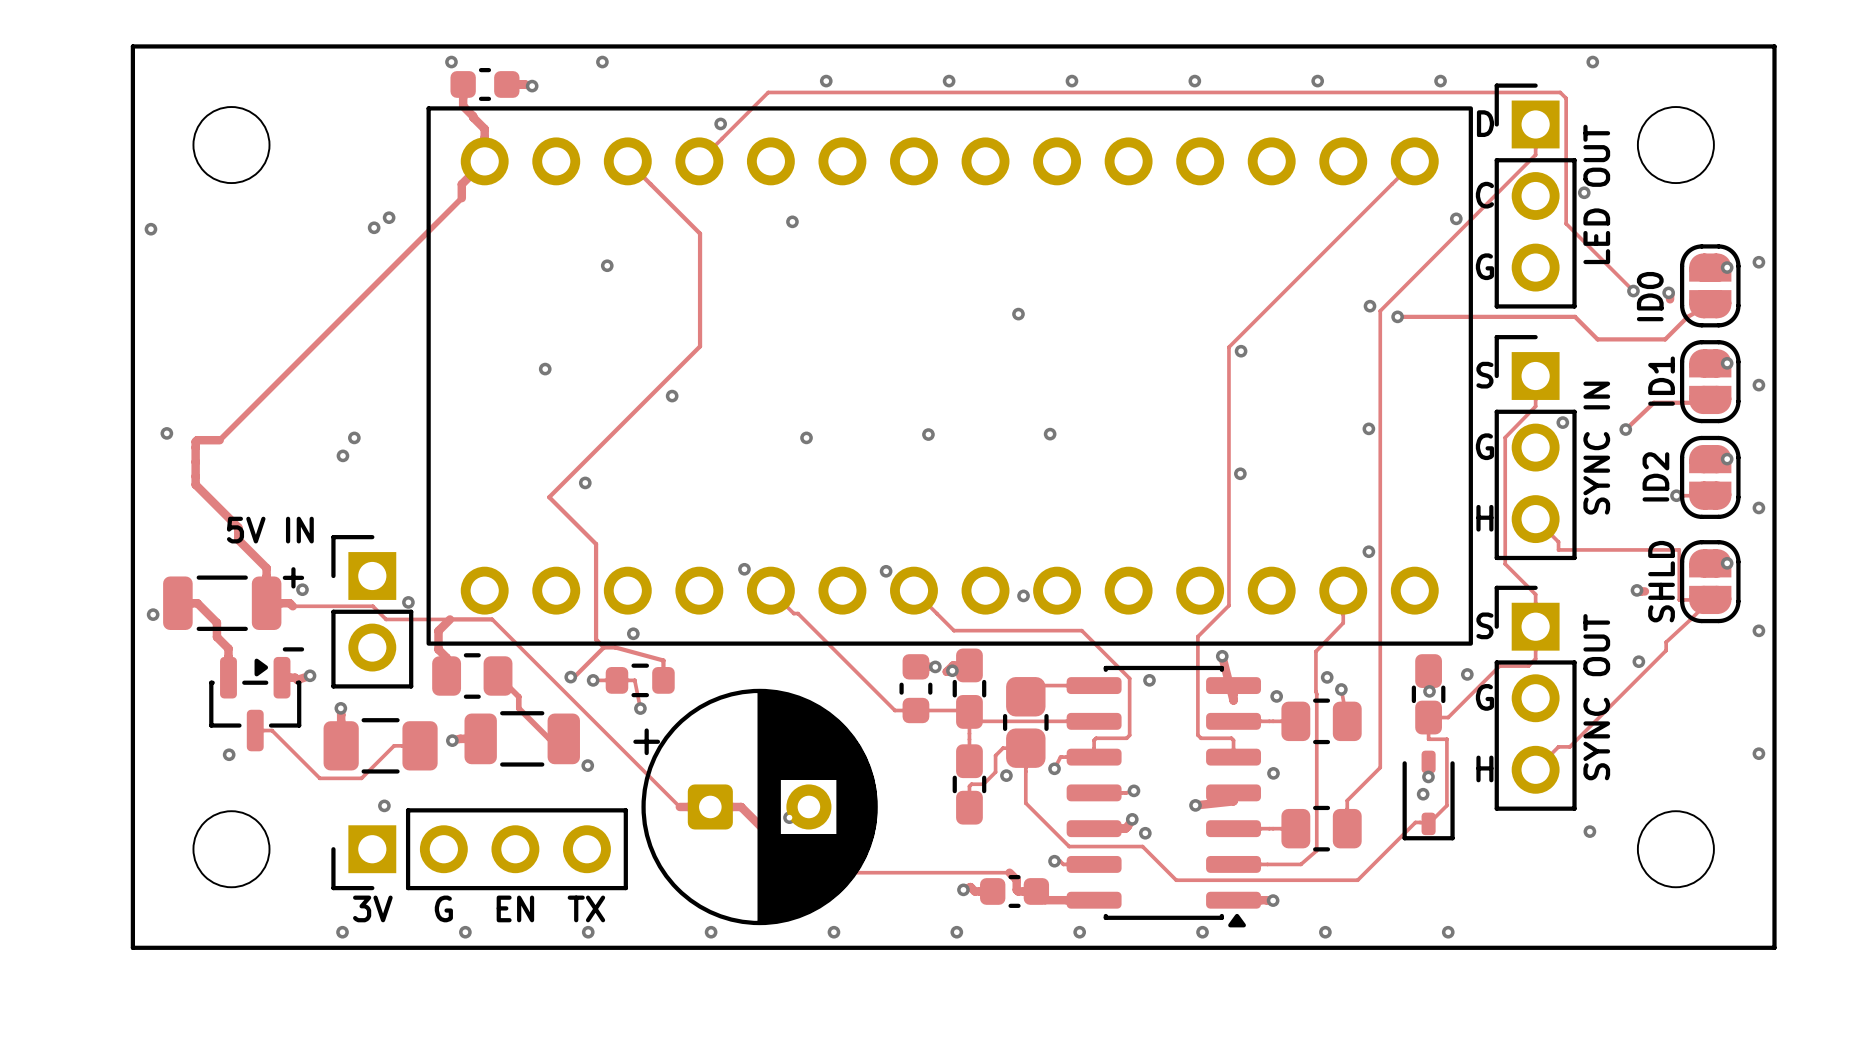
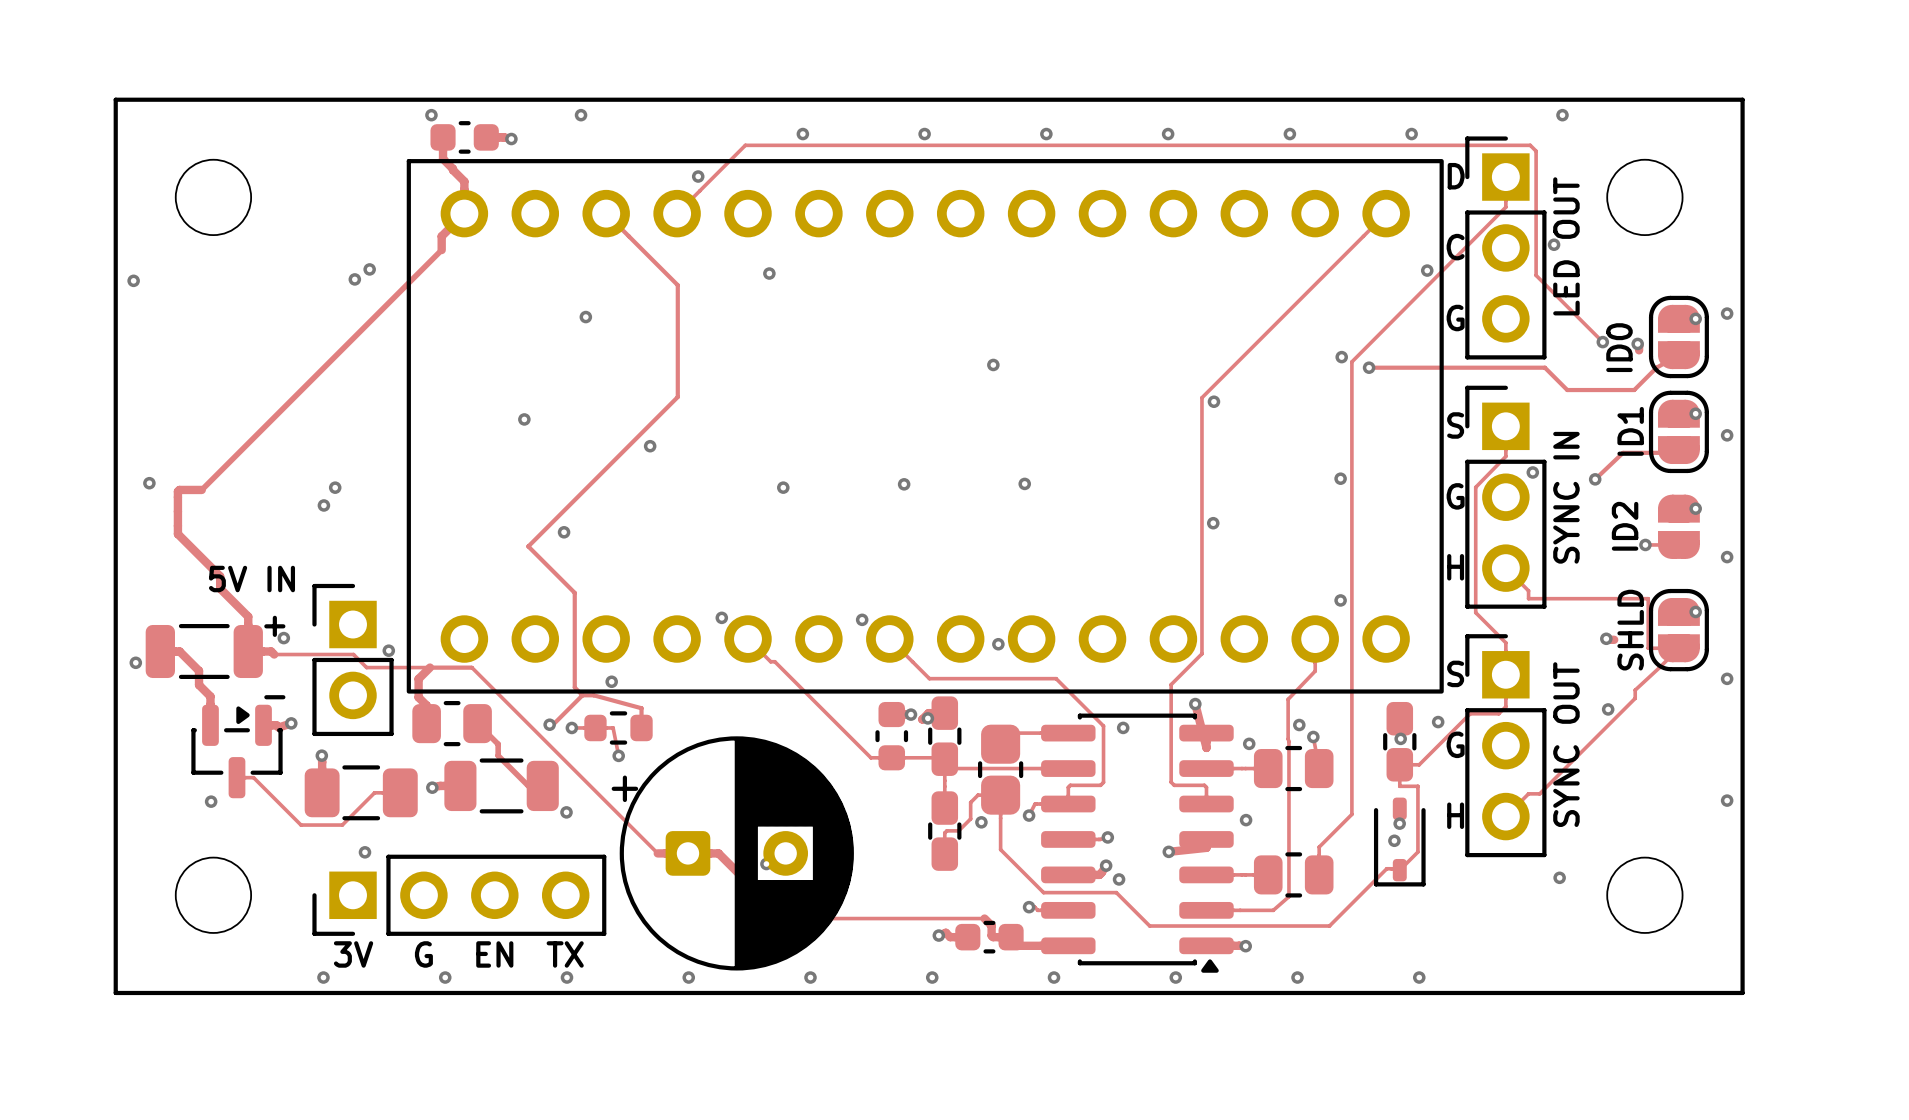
part footprint: [1679, 435, 1741, 519] -> [1658, 494, 1700, 559]

